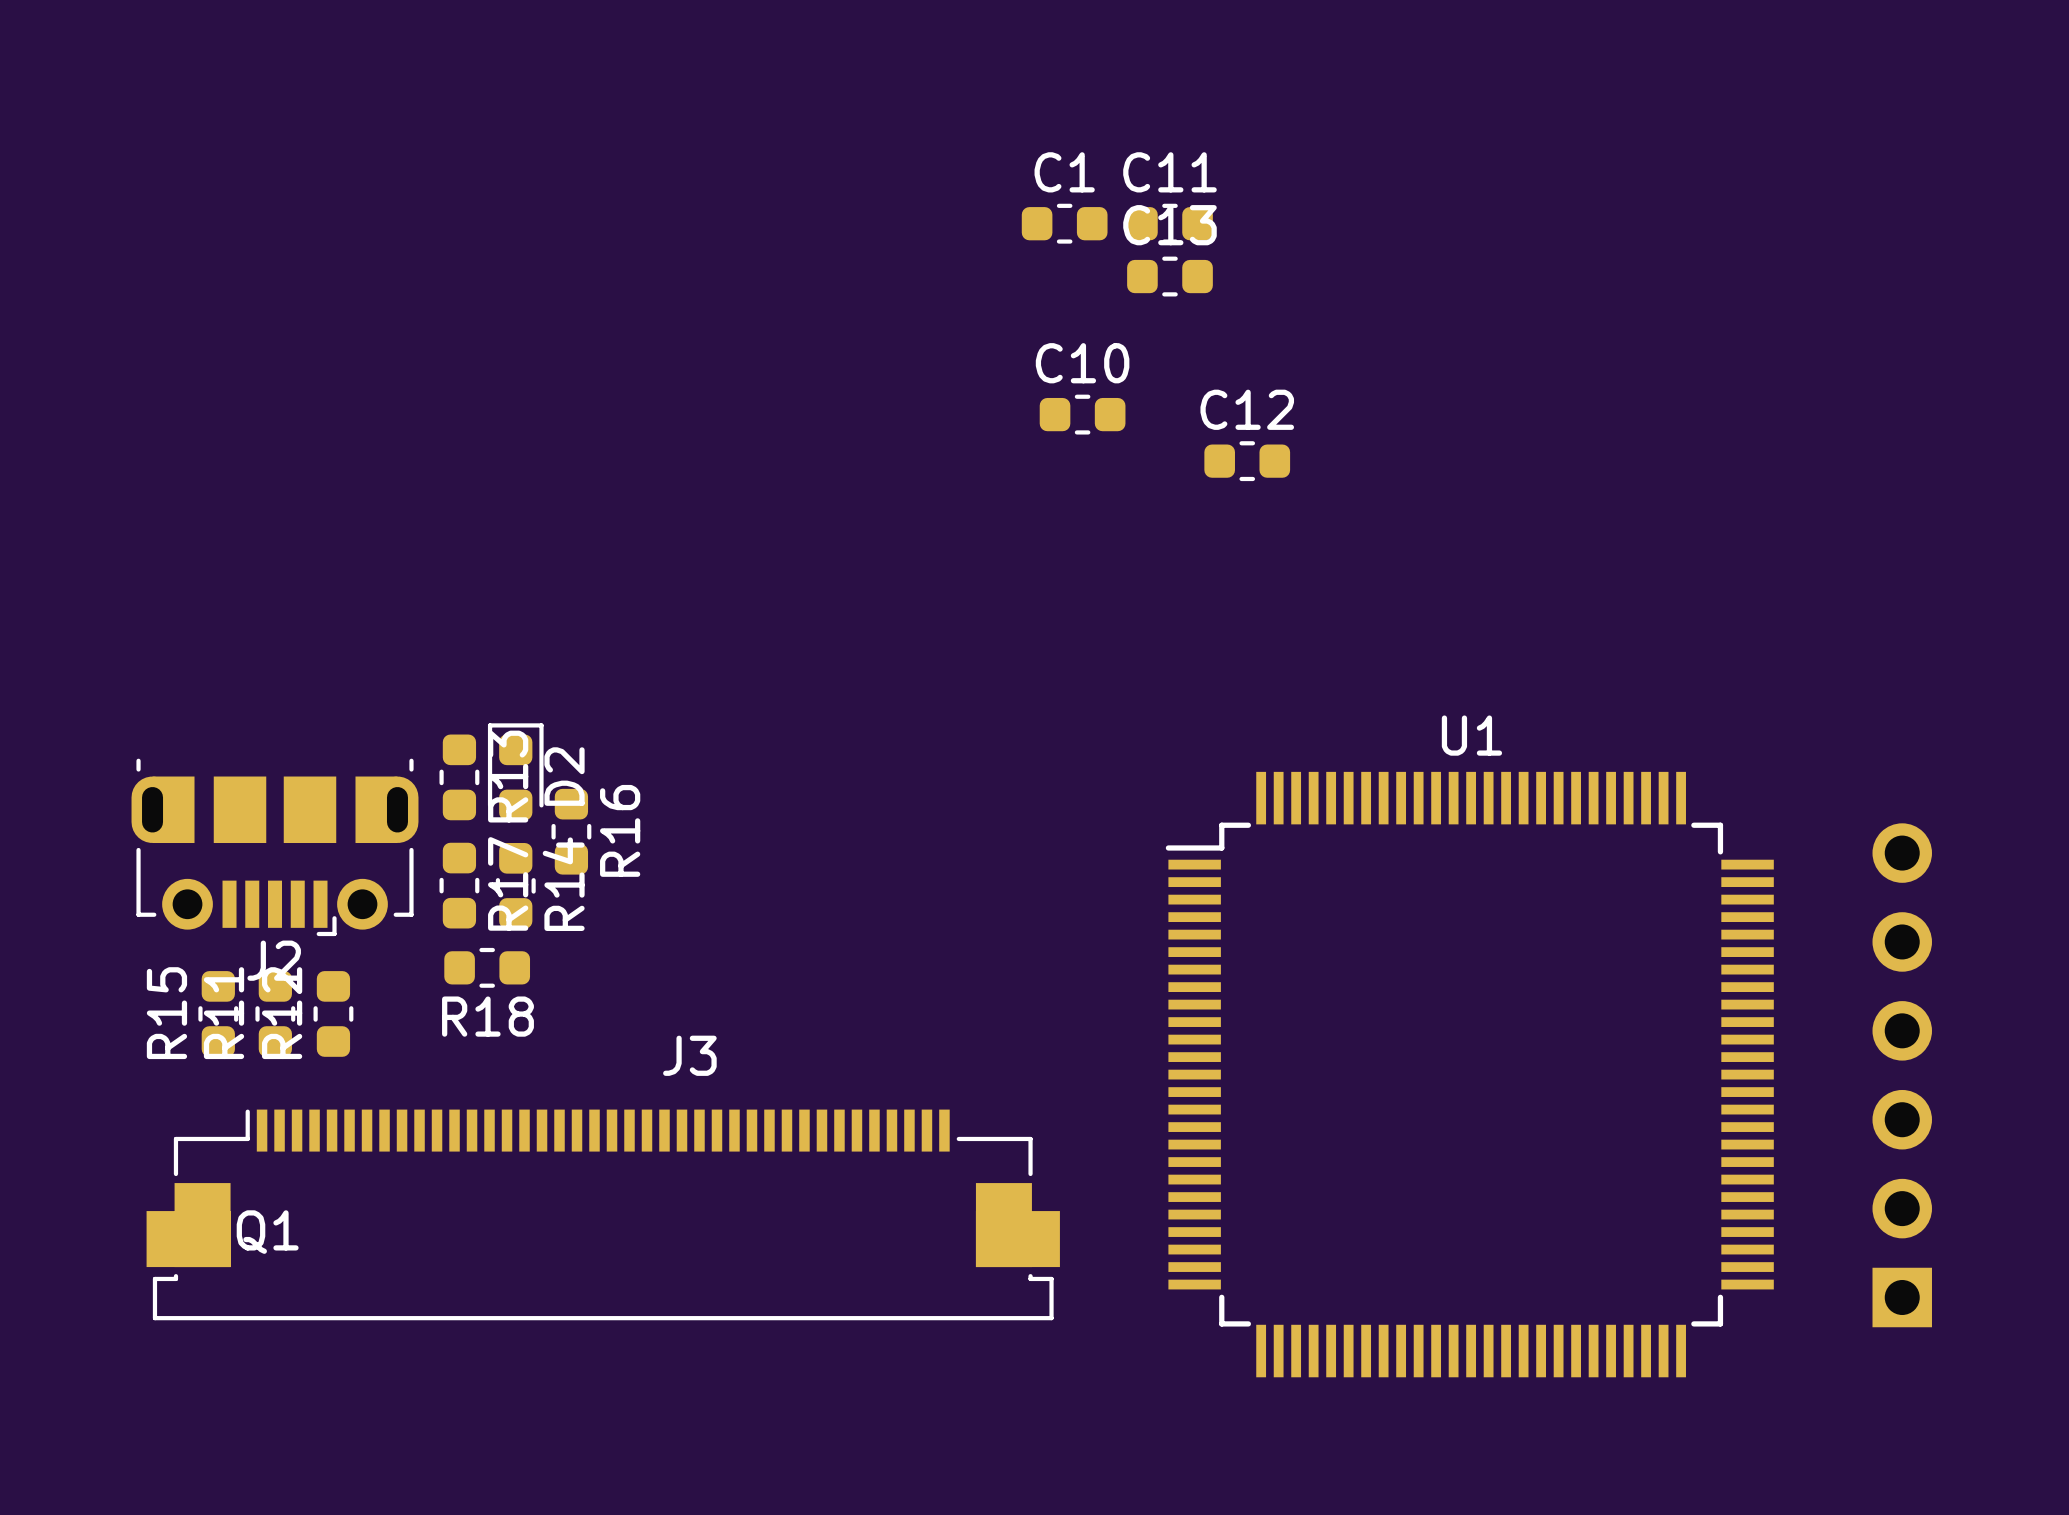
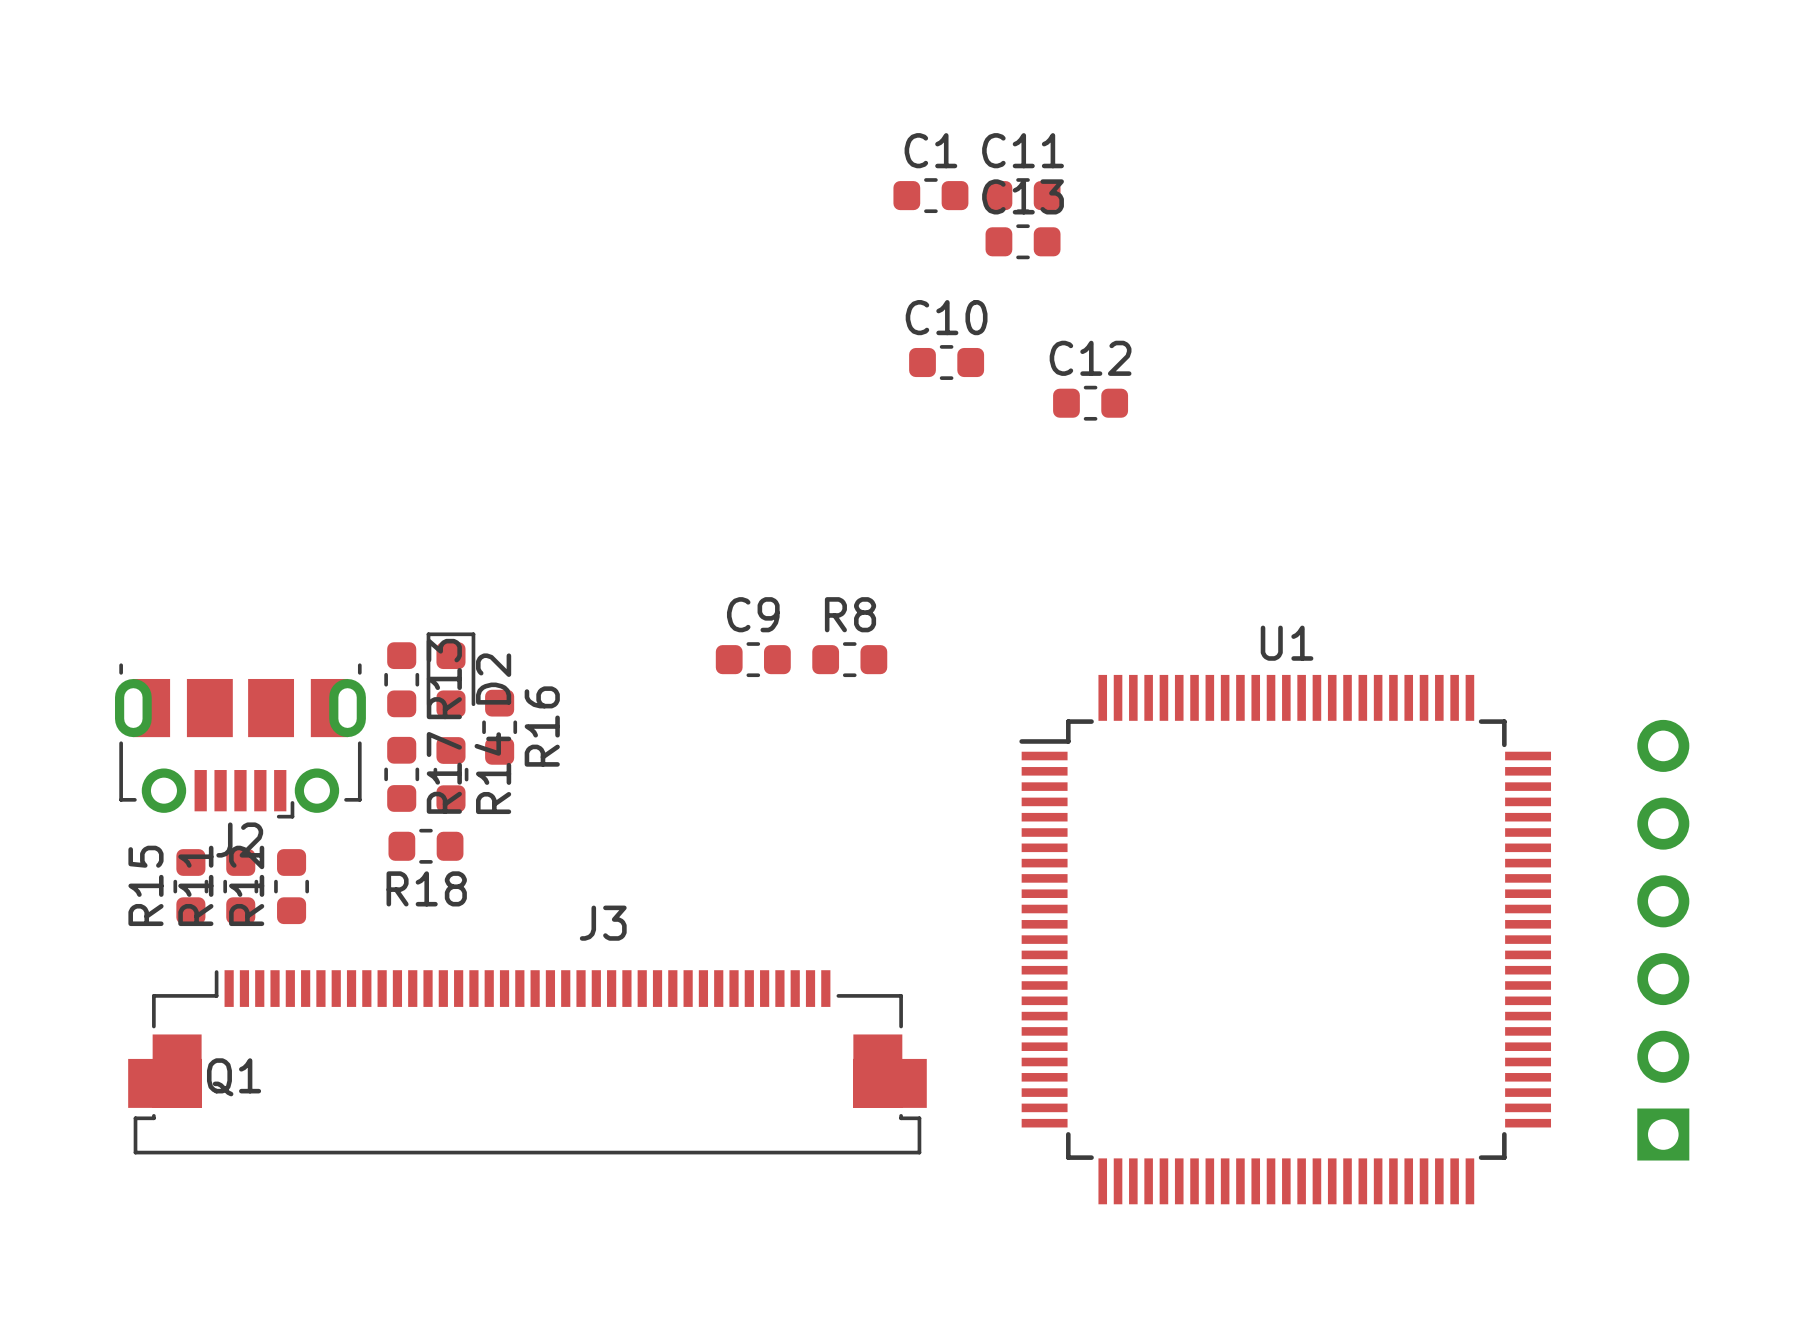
C9: none -> (753, 659)
R8: none -> (849, 659)

